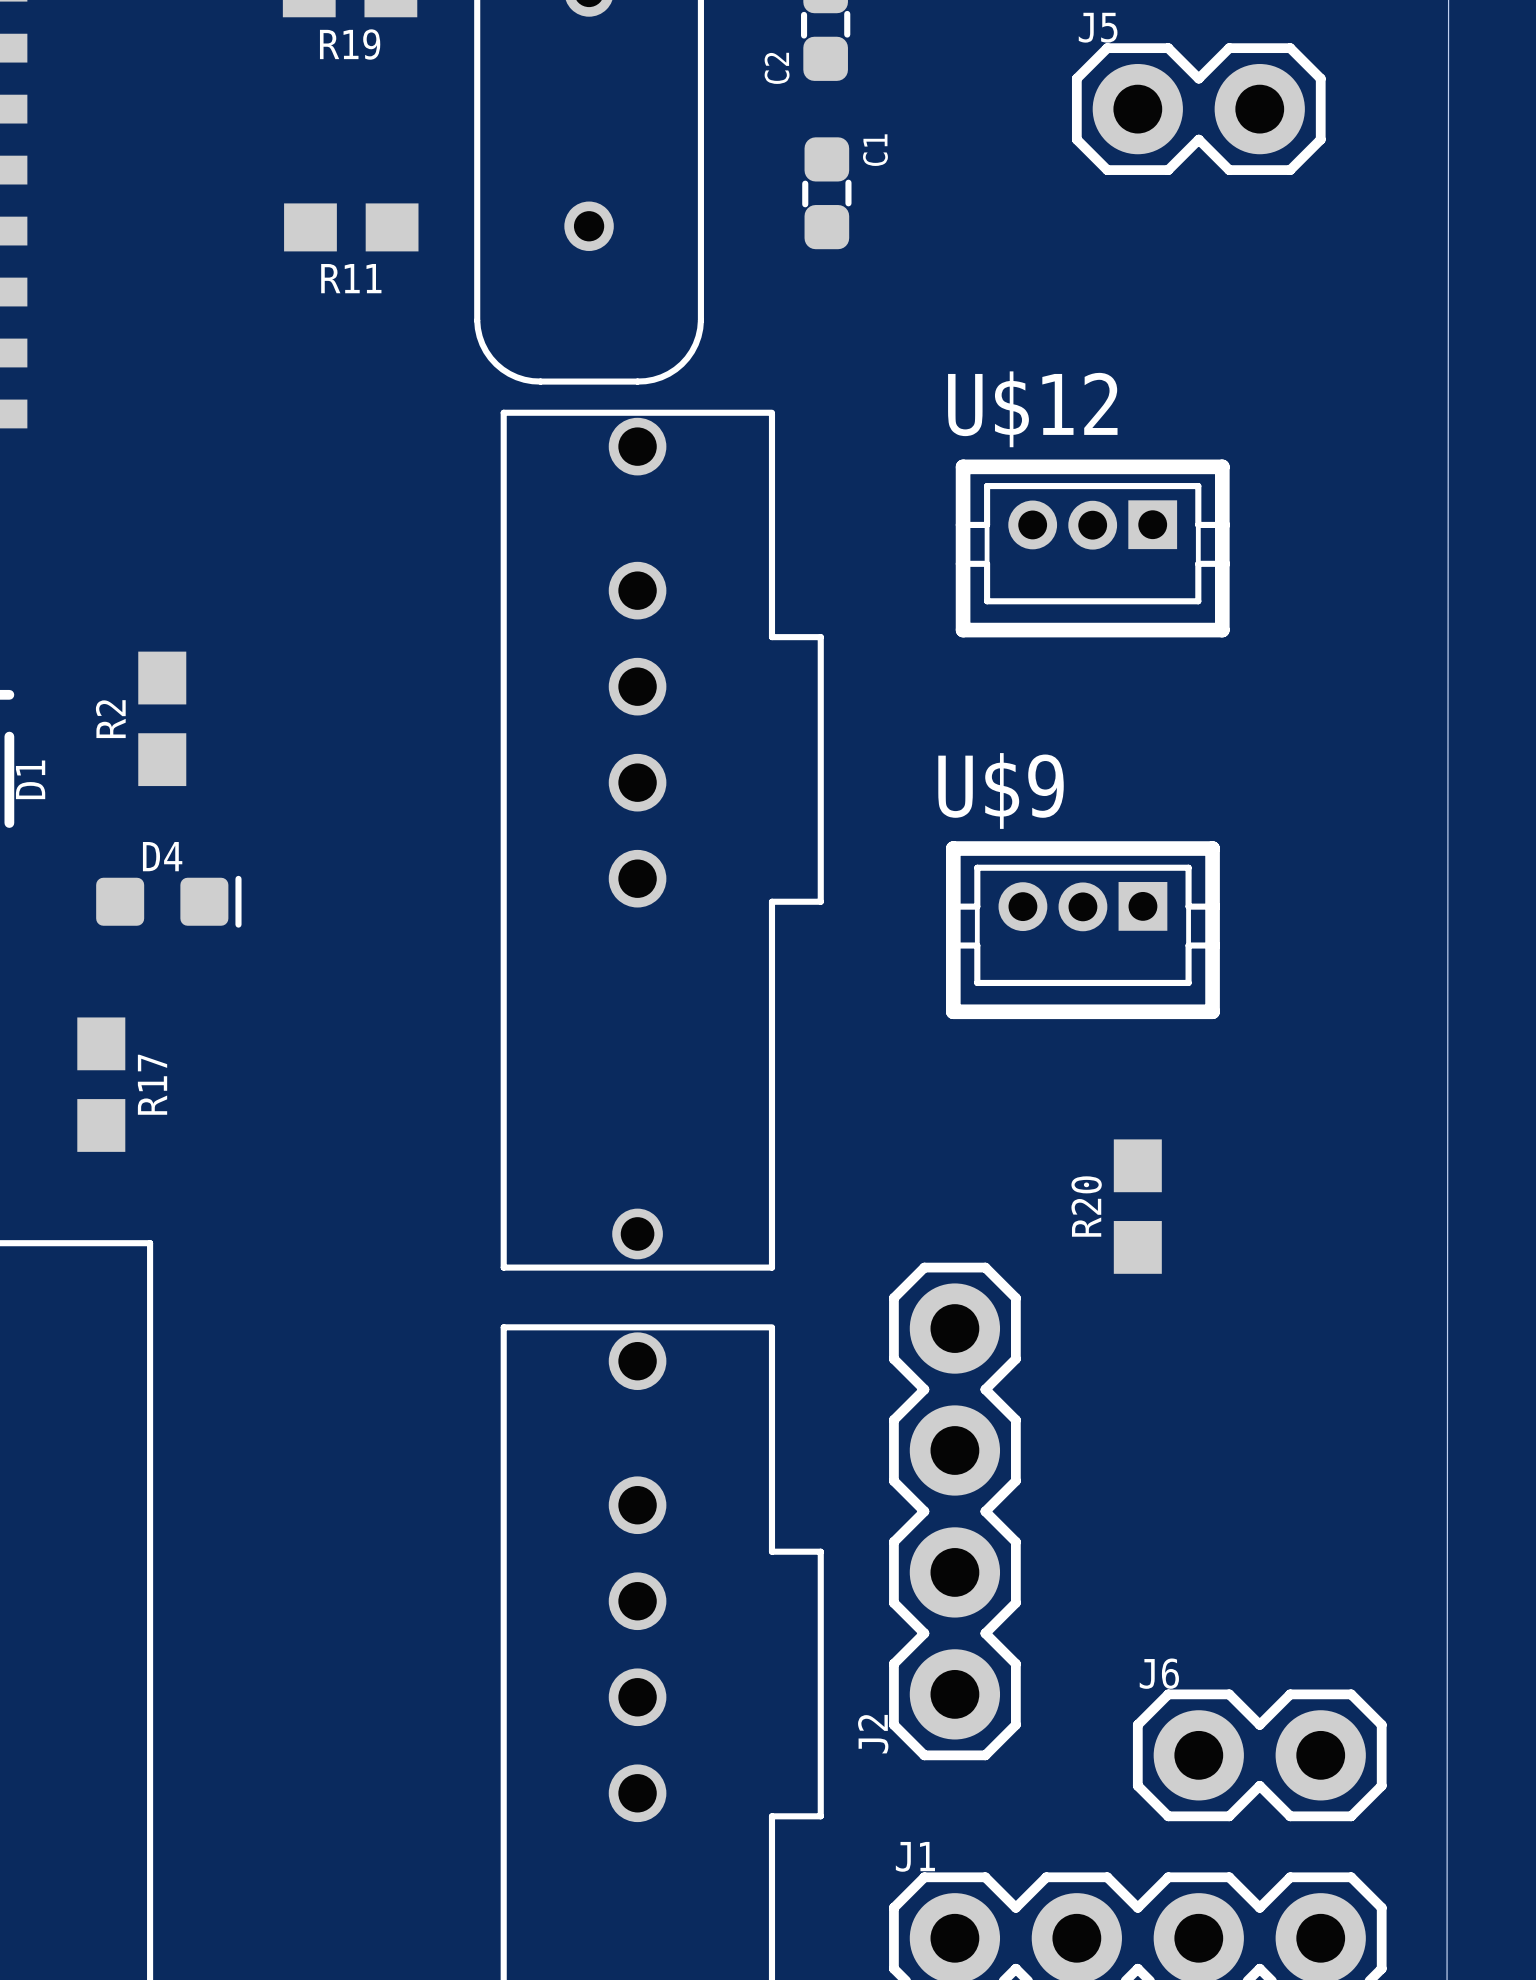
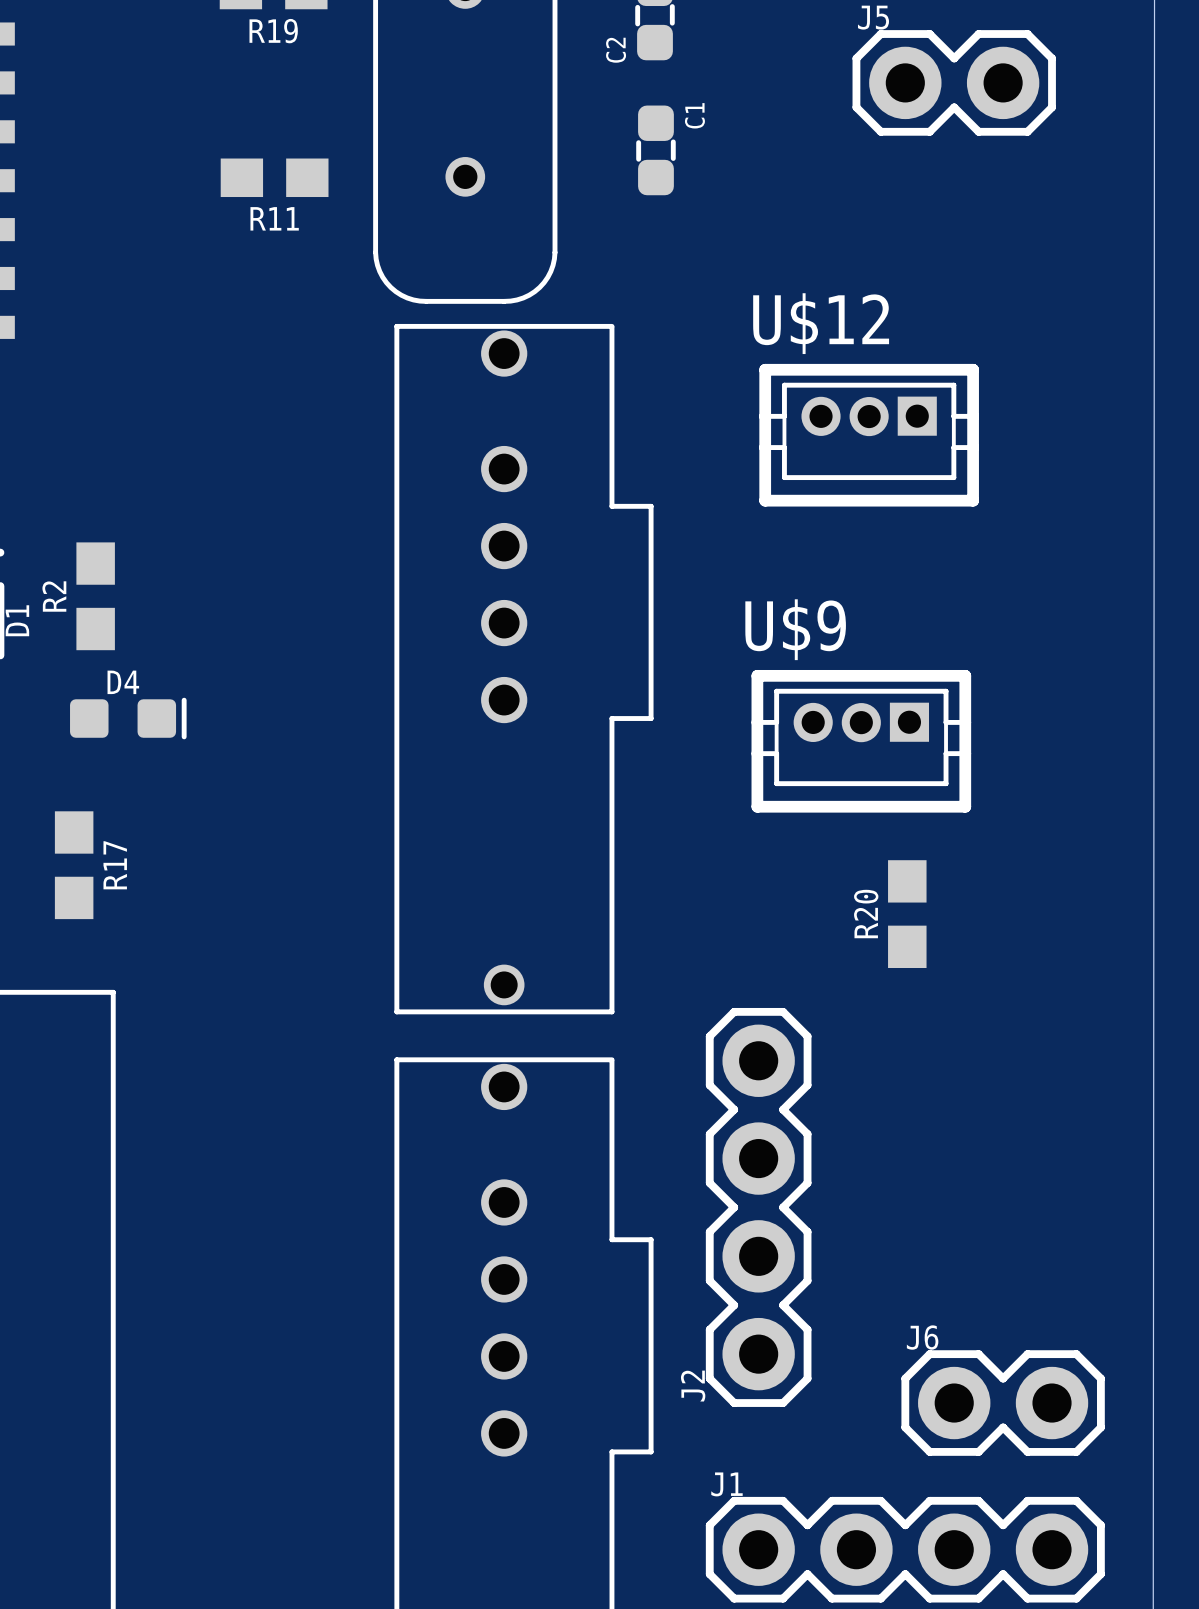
R2 position: (162, 718) -> (95, 596)
R20 position: (1137, 1206) -> (907, 914)

